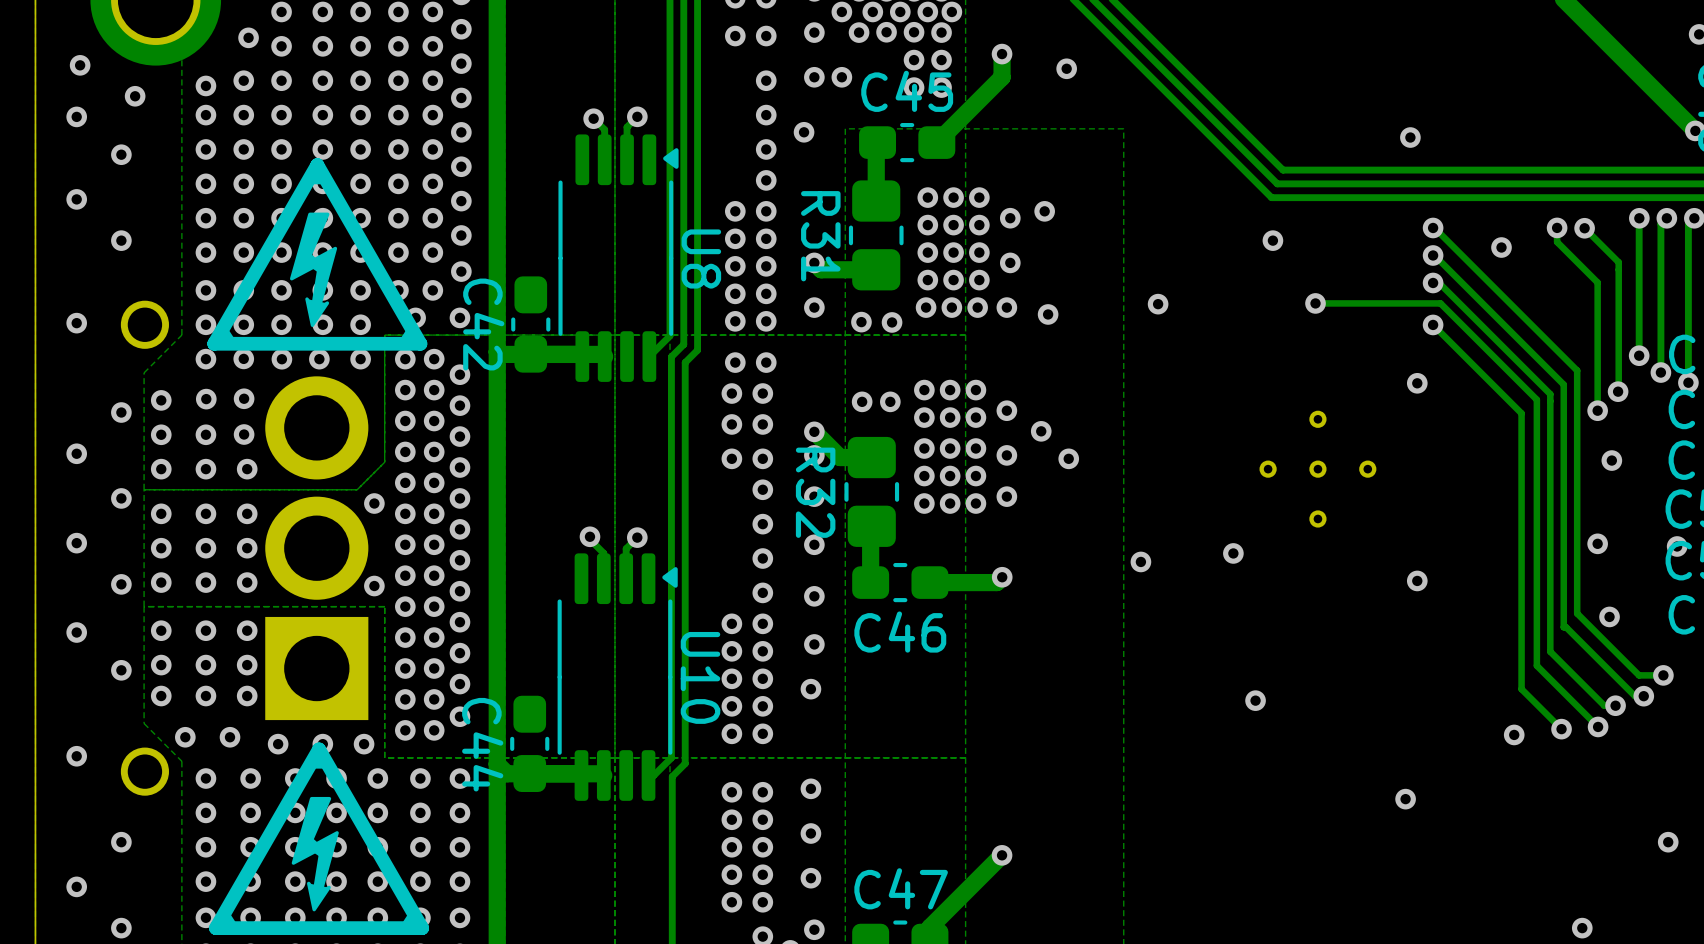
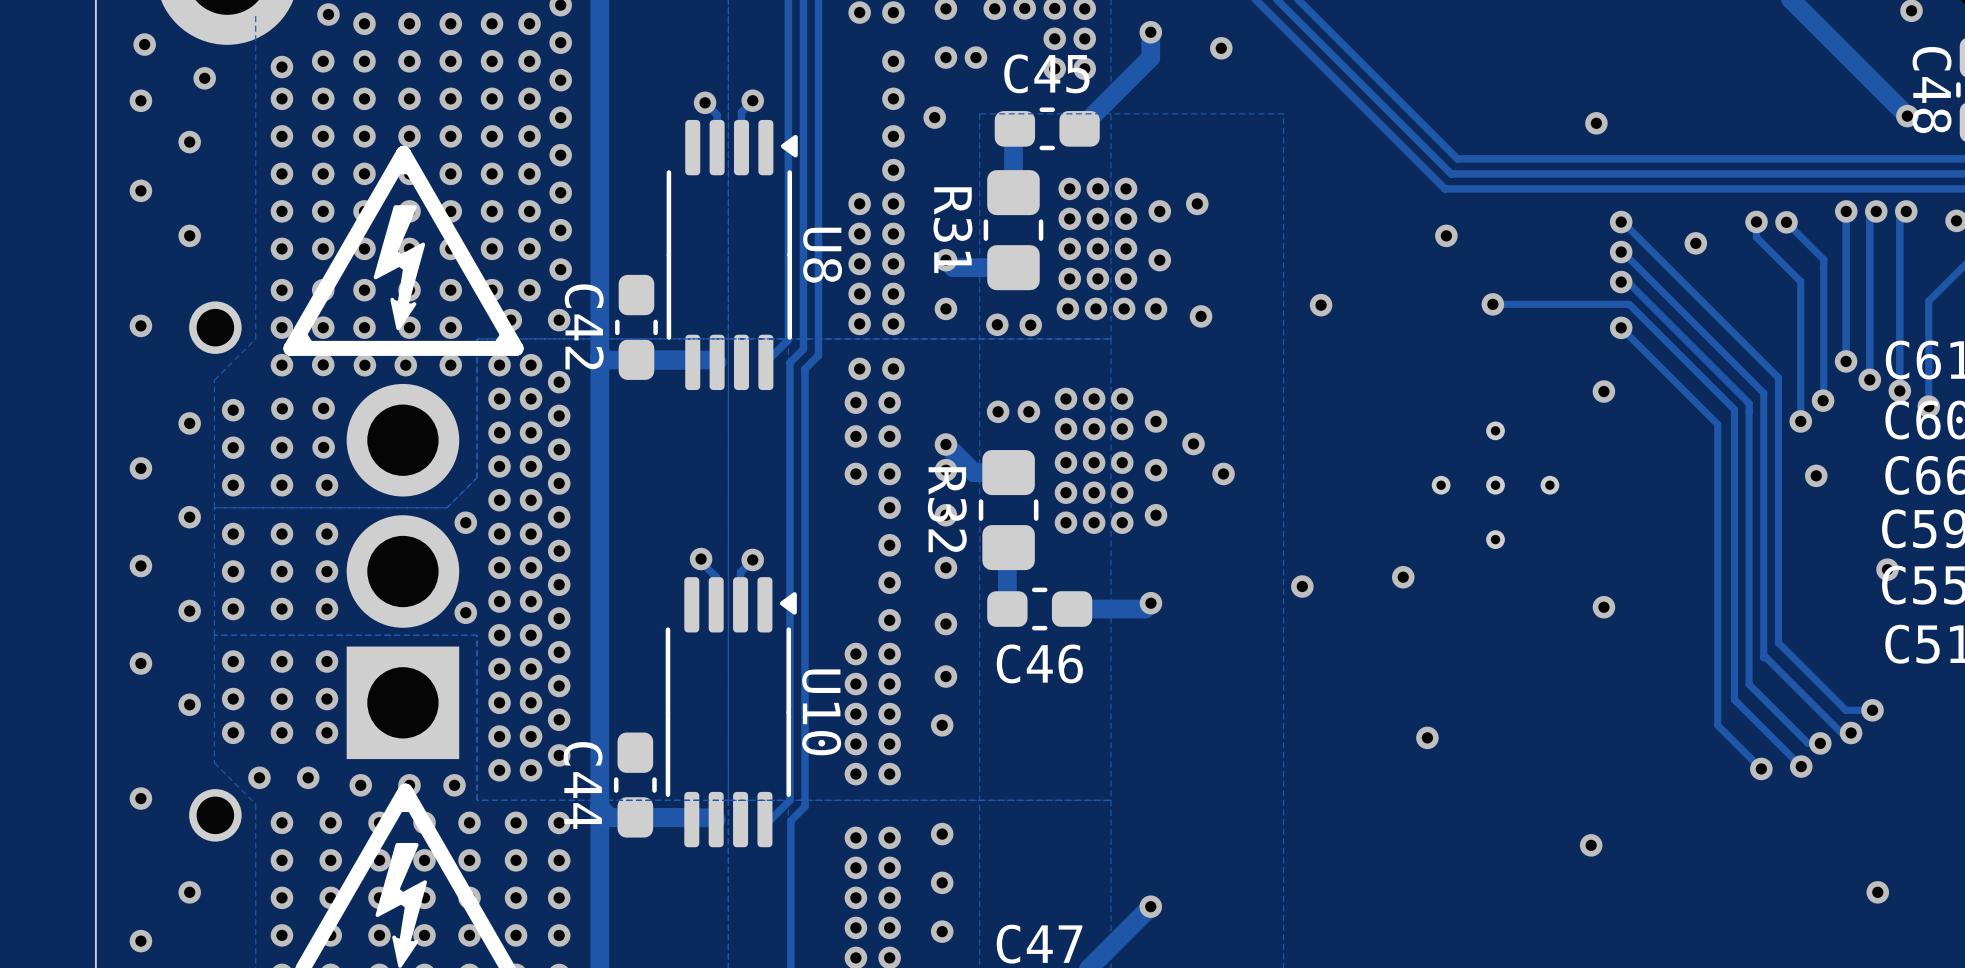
via: (1597, 543) -> none
via: (1609, 616) -> none
via: (1514, 734) -> none

